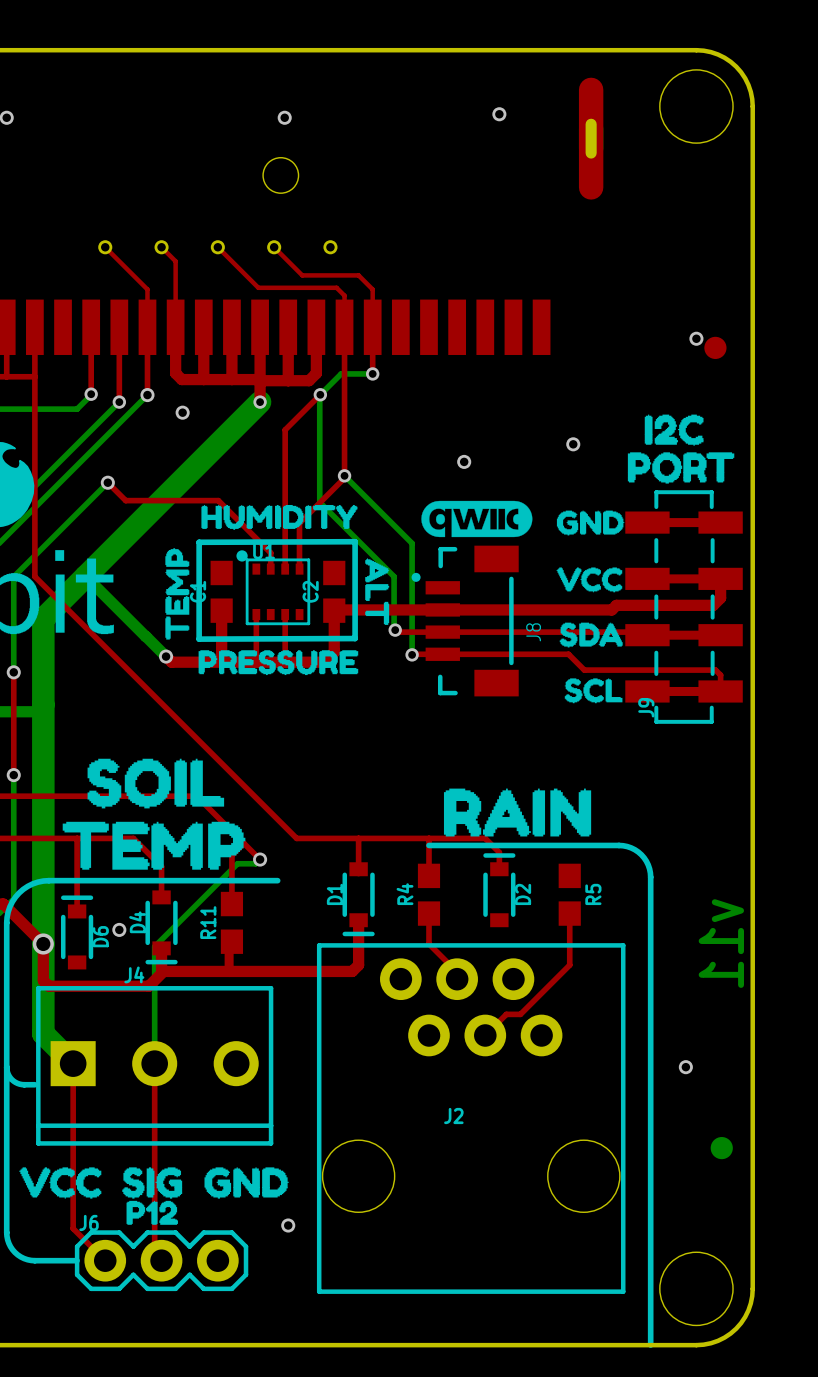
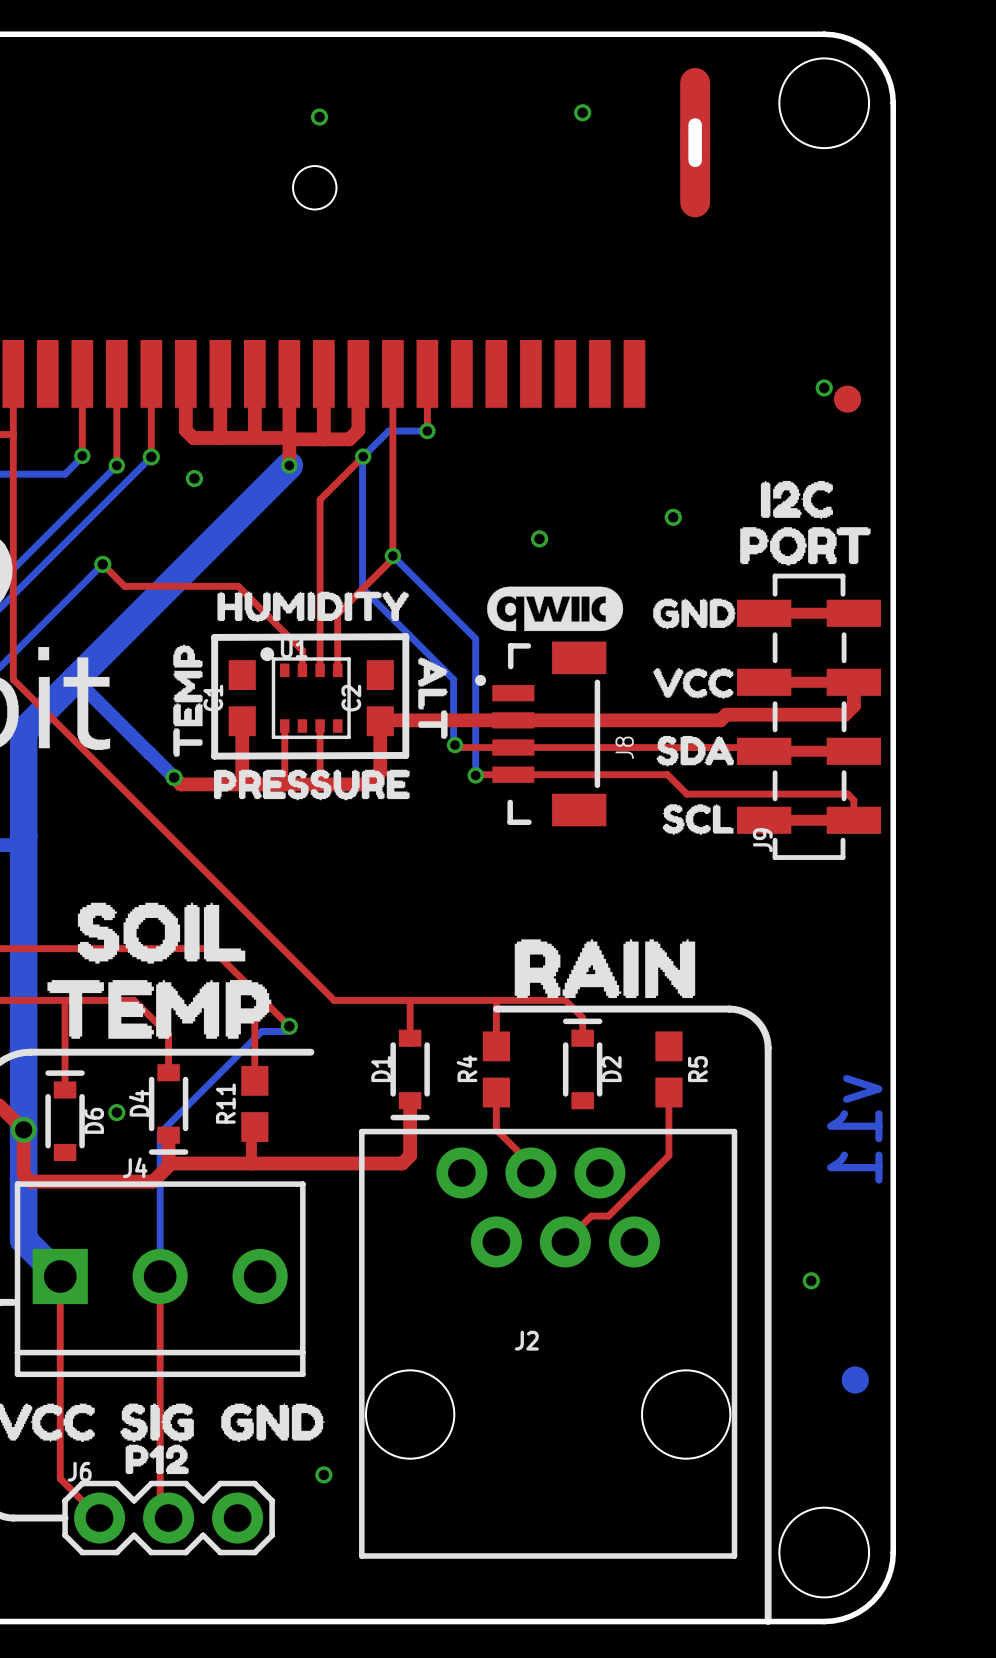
top track: (105, 247) (147, 289) (147, 327) -> none
part: (105, 247) -> none
top track: (161, 247) (175, 261) (175, 327) -> none
part: (161, 247) -> none
top track: (217, 247) (258, 287) (336, 287) (344, 295) (344, 327) -> none
part: (217, 247) -> none
top track: (274, 247) (302, 275) (358, 275) (372, 289) (372, 327) -> none
part: (274, 247) -> none
part: (330, 247) -> none

